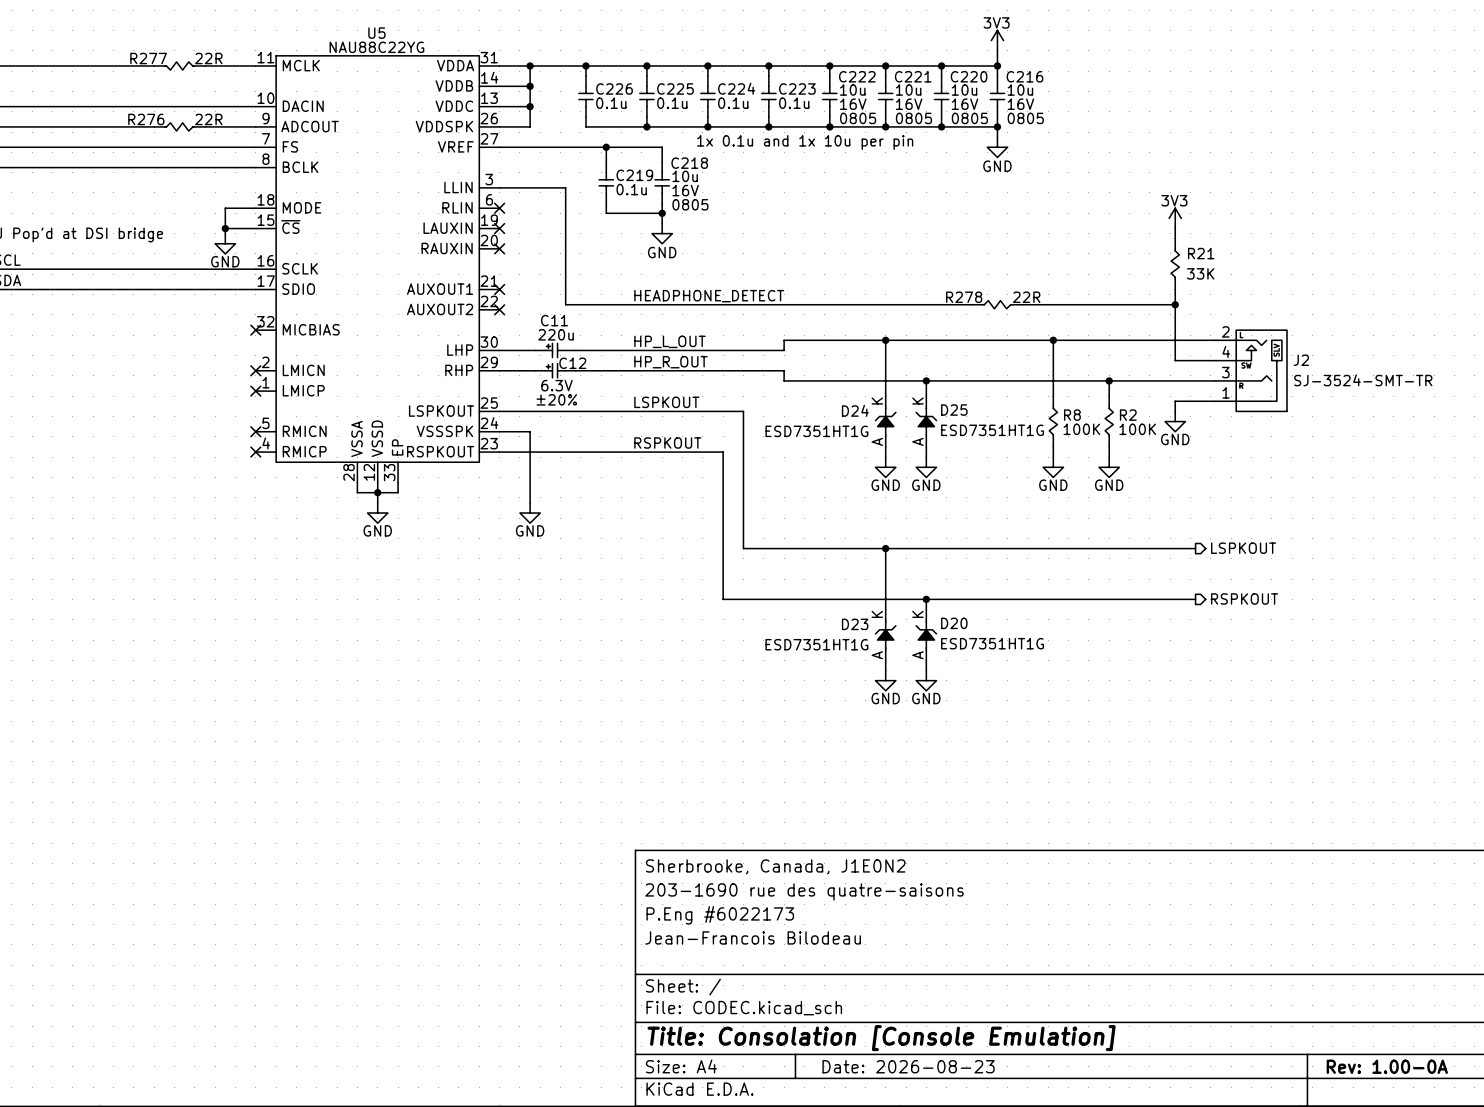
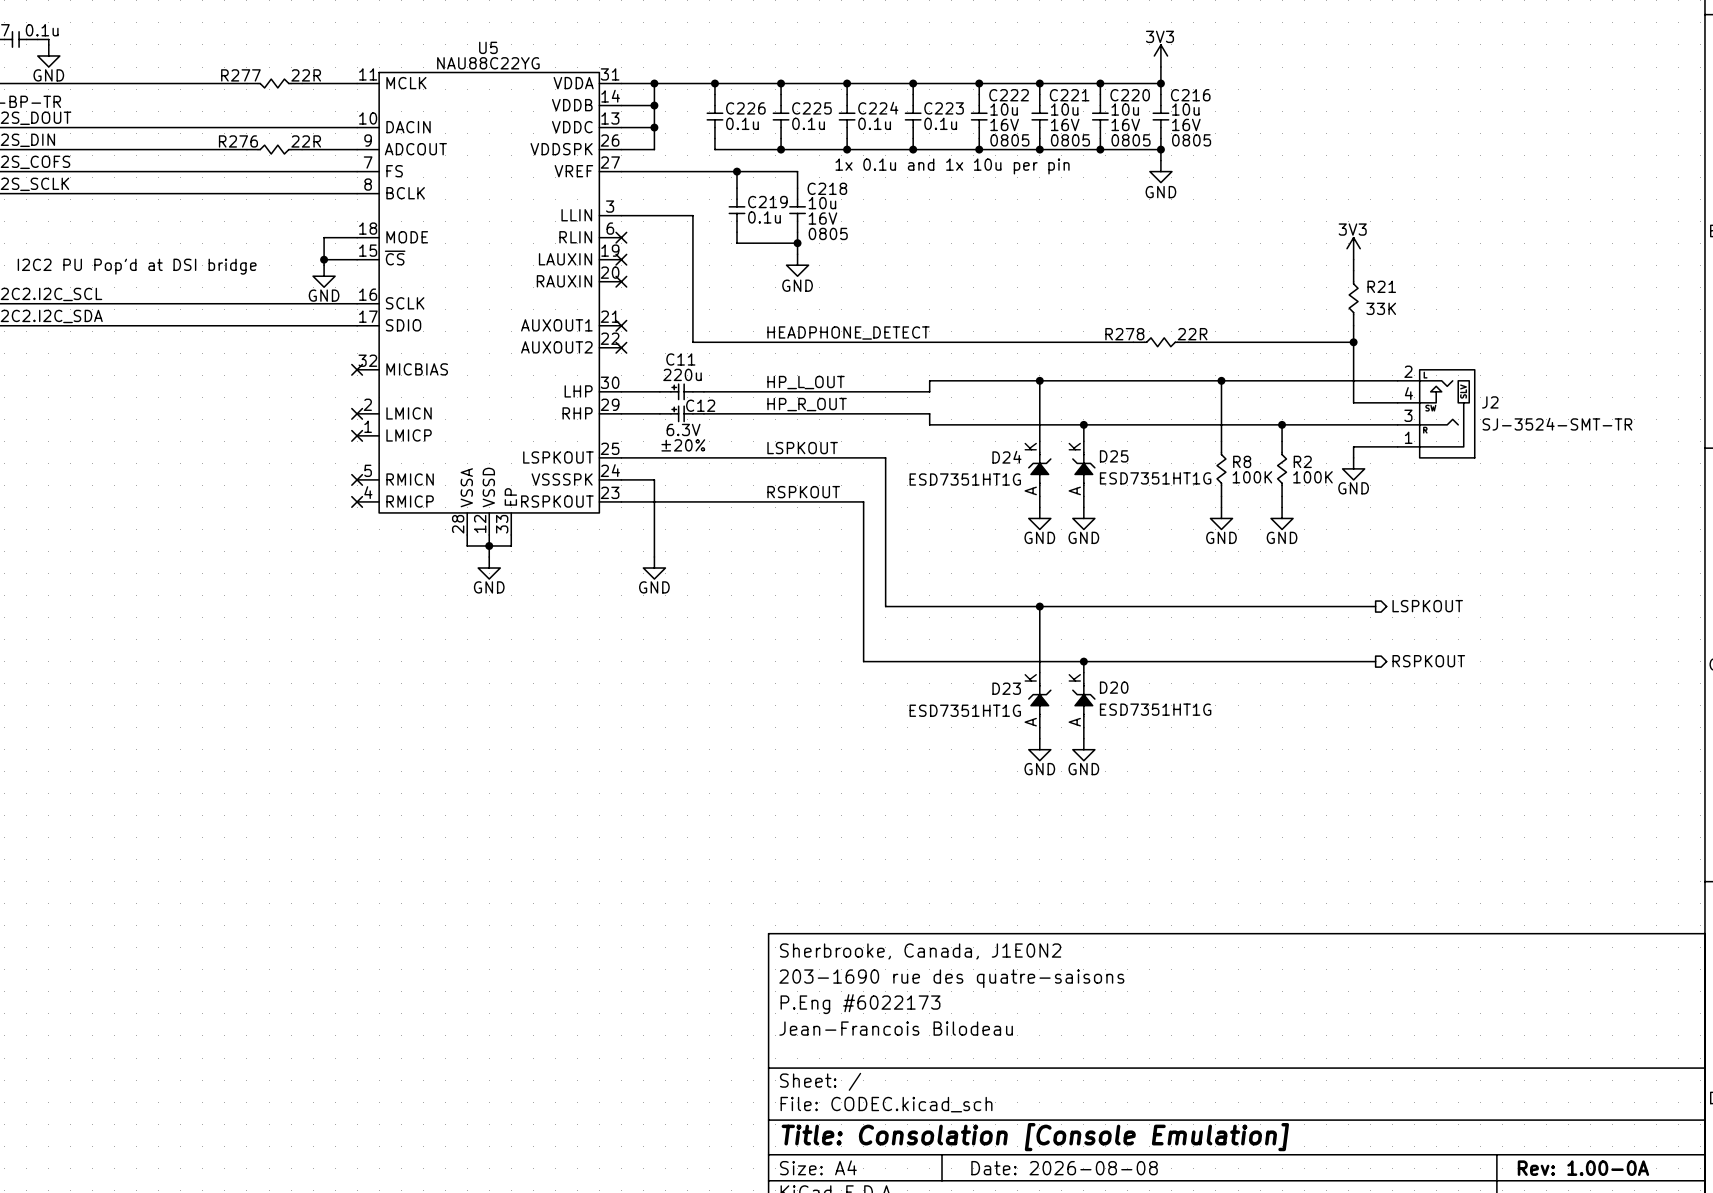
title block: Date: 2026-08-23 (908, 1066) -> Date: 2026-08-08 (1064, 1168)

